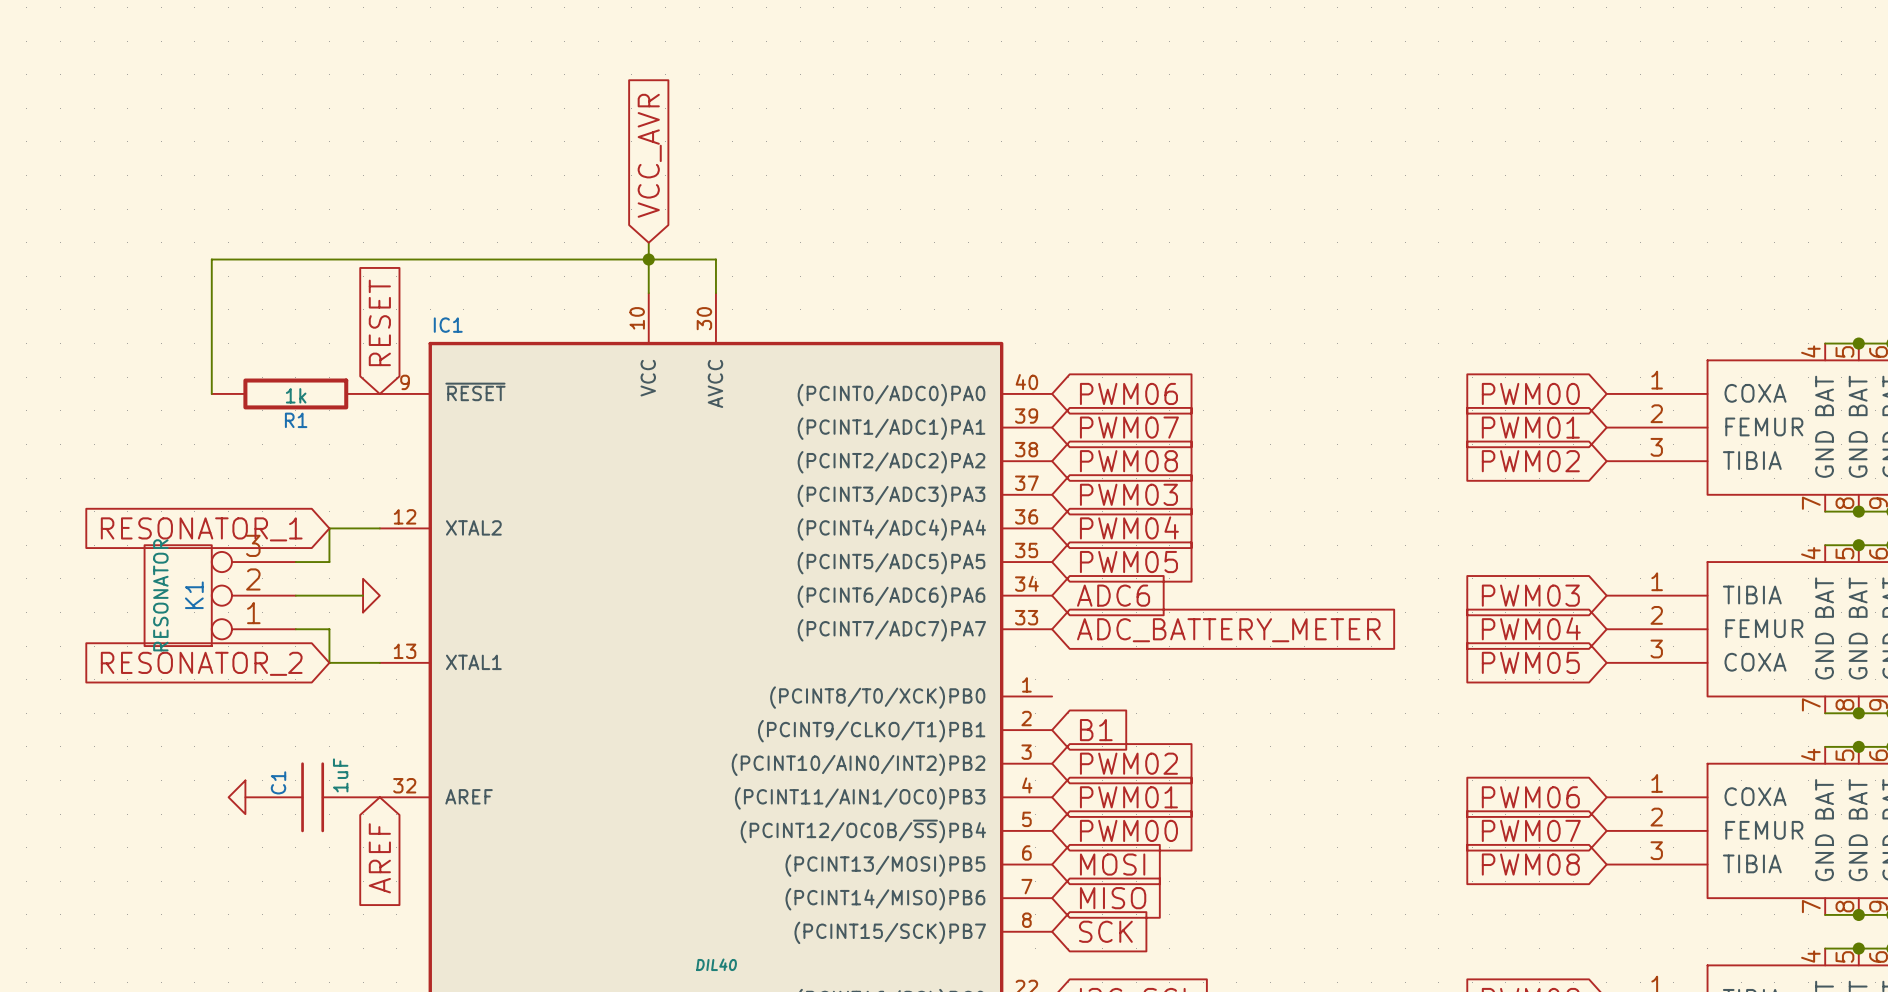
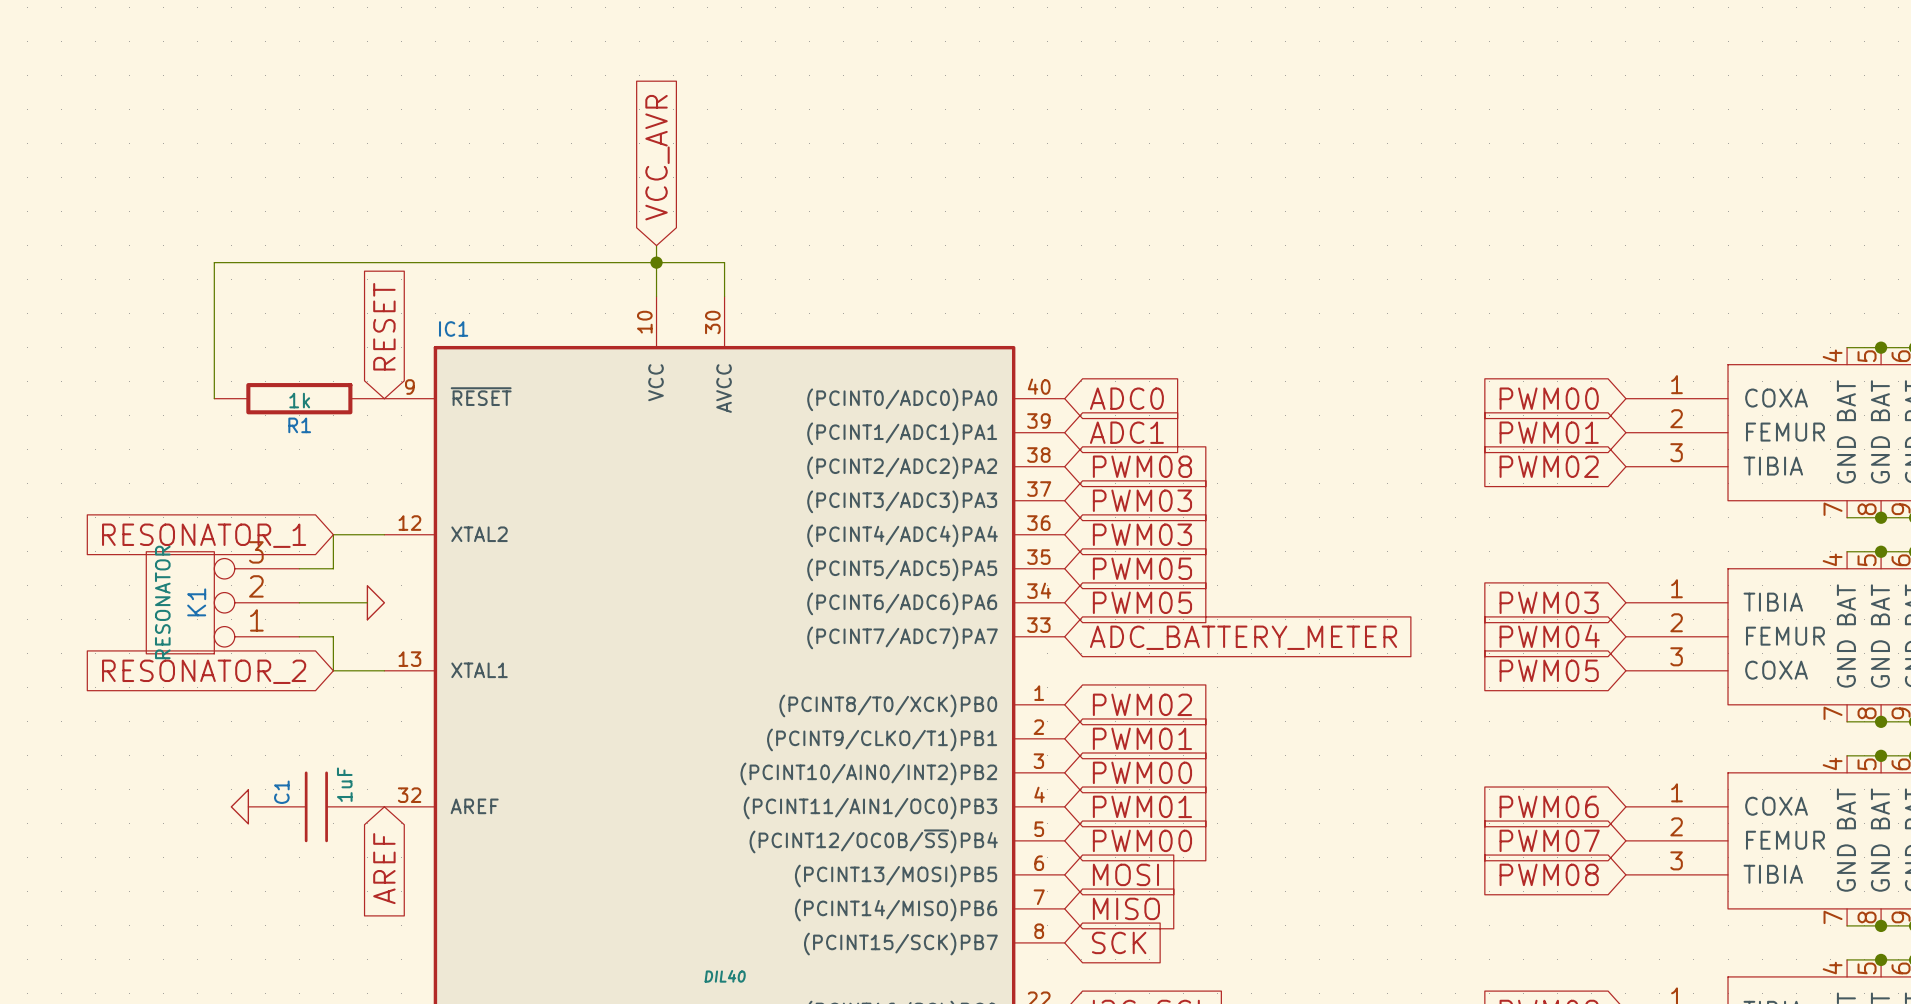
global label: PWM06 (1128, 393) -> ADC0 (1126, 398)
global label: PWM07 (1129, 427) -> ADC1 (1126, 432)
global label: PWM04 (1129, 527) -> PWM03 (1142, 534)
global label: ADC6 (1113, 595) -> PWM05 (1142, 602)
global label: none -> PWM02 (1142, 704)
global label: B1 (1096, 730) -> PWM01 (1142, 738)
global label: PWM02 (1128, 763) -> PWM00 (1142, 772)

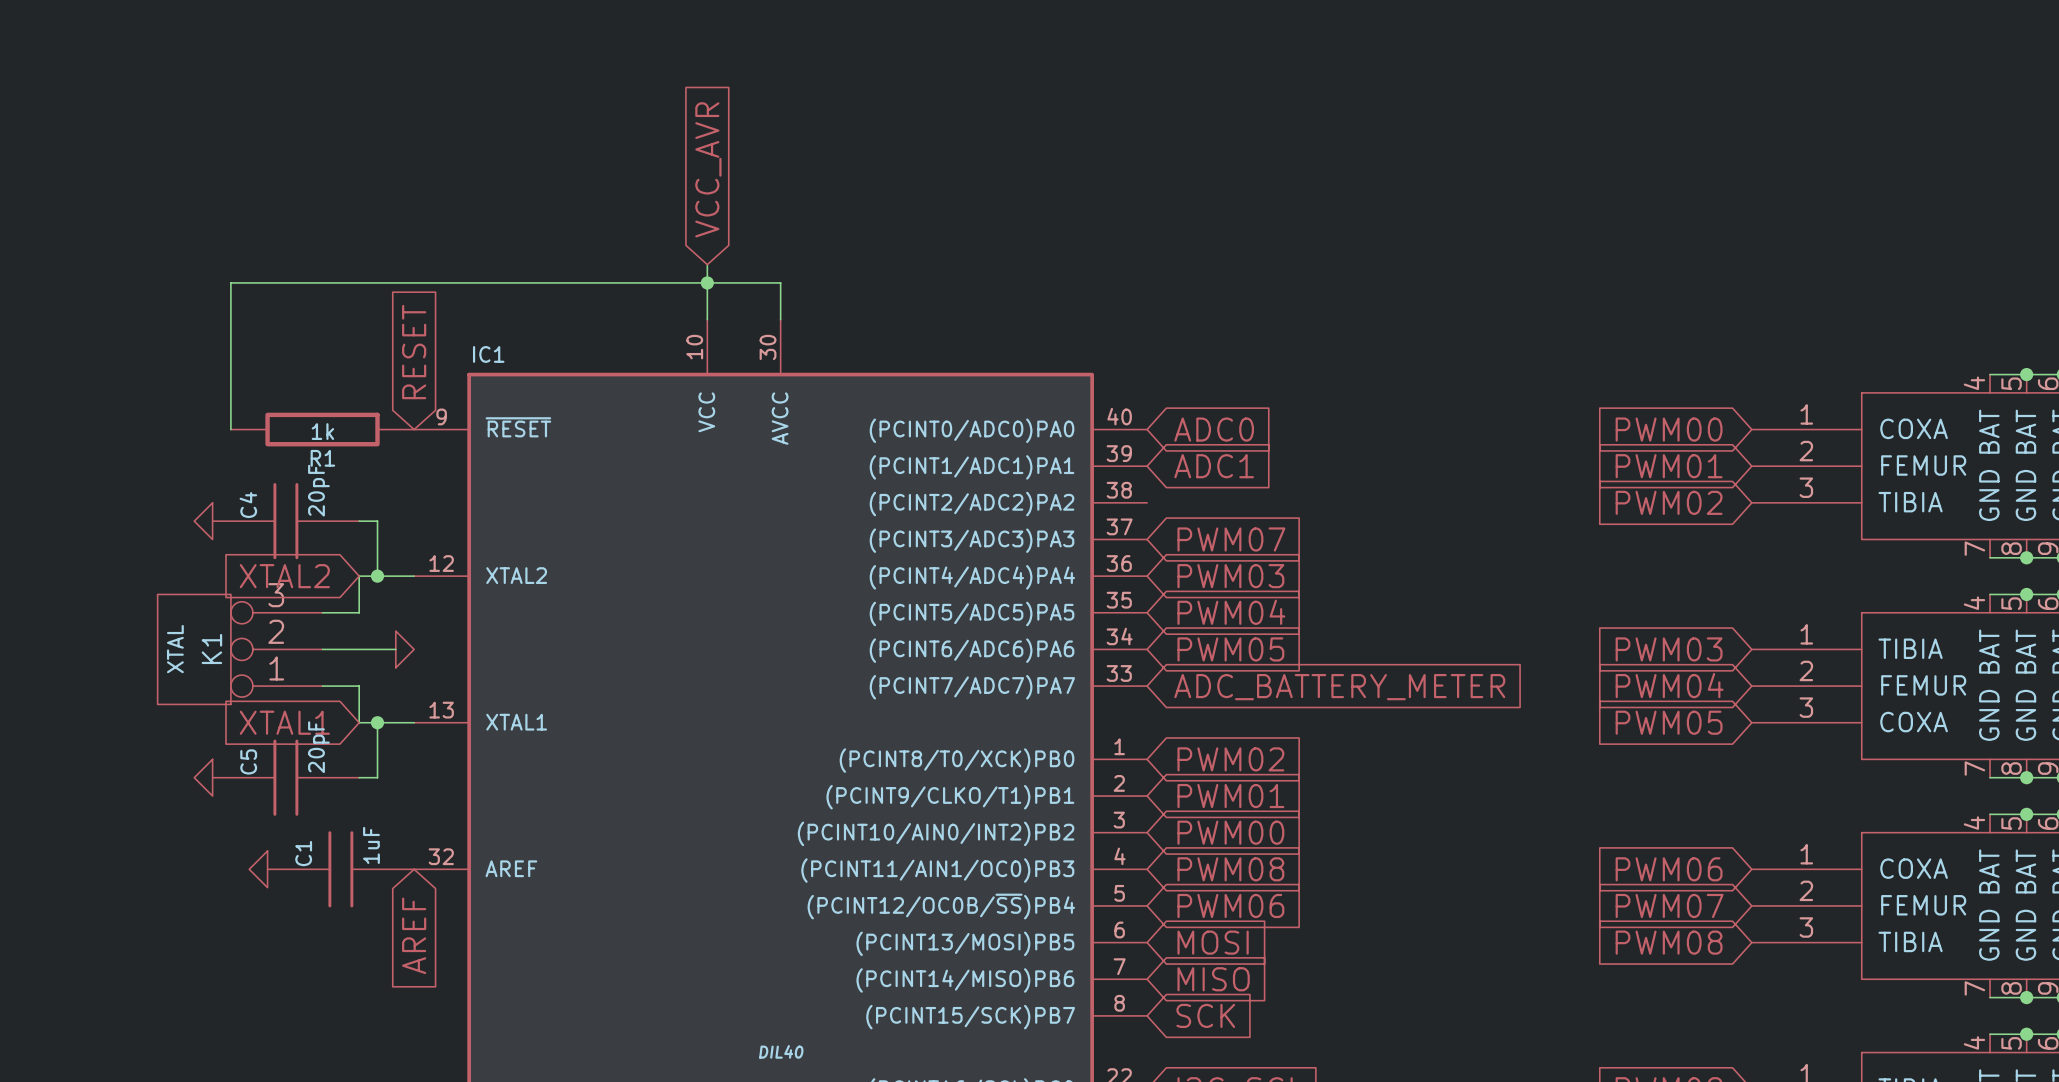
global label: PWM08 (1142, 466) -> none
power symbol: none -> (203, 521)
C4: none -> 20pF (285, 521)
wire: none -> (359, 521) (377, 521) (377, 576)
global label: PWM03 (1142, 500) -> PWM07 (1231, 539)
junction: none -> (377, 576)
global label: RESONATOR_1 (204, 535) -> XTAL2 (284, 576)
global label: PWM05 (1142, 568) -> PWM04 (1231, 612)
K1 value: RESONATOR (162, 602) -> XTAL (175, 649)
wire: none -> (377, 722) (377, 777) (359, 777)
junction: none -> (377, 722)
global label: RESONATOR_2 (204, 671) -> XTAL1 (284, 722)
power symbol: none -> (203, 777)
C5: none -> 20pF (285, 777)
global label: PWM01 (1142, 806) -> PWM08 (1230, 869)
global label: PWM00 (1142, 840) -> PWM06 (1230, 905)

